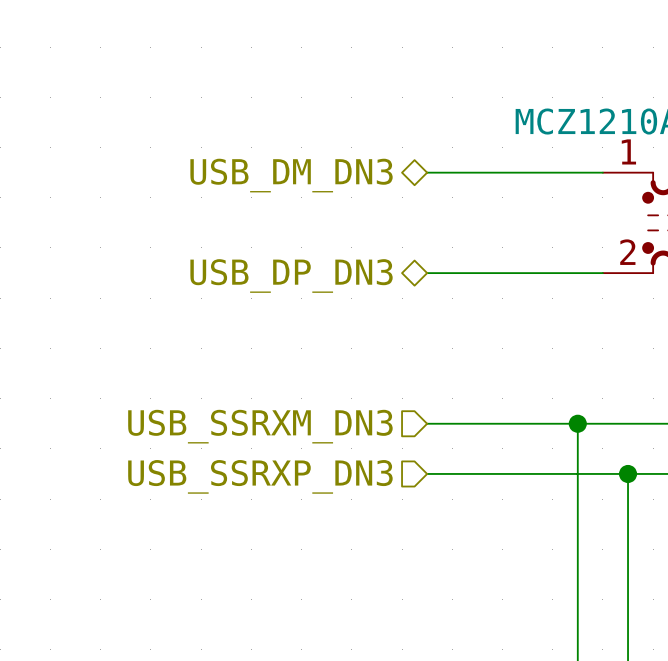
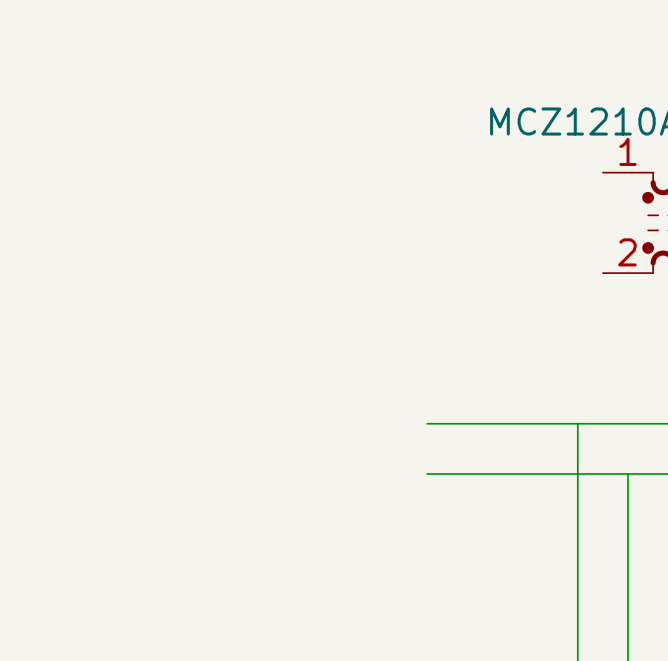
wire: (427, 172) (602, 172) -> none
hierarchical label: USB_DM_DN3 (291, 175) -> none
wire: (427, 273) (602, 273) -> none
hierarchical label: USB_DP_DN3 (291, 275) -> none
junction: (577, 423) -> none
hierarchical label: USB_SSRXM_DN3 (260, 426) -> none
junction: (628, 473) -> none
hierarchical label: USB_SSRXP_DN3 (260, 476) -> none

